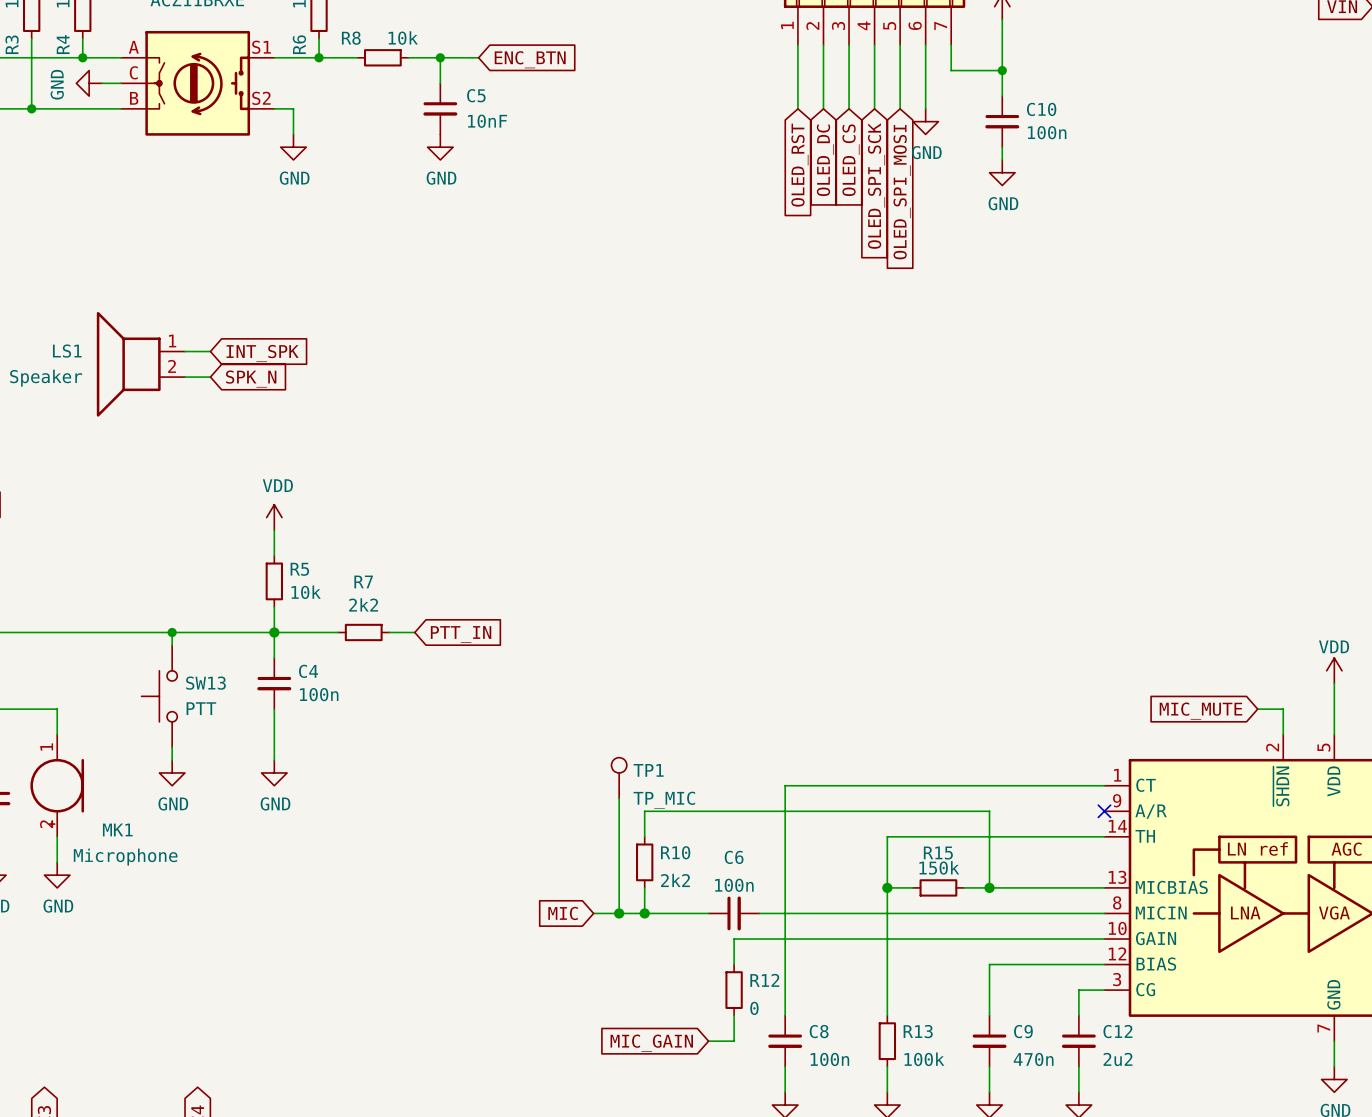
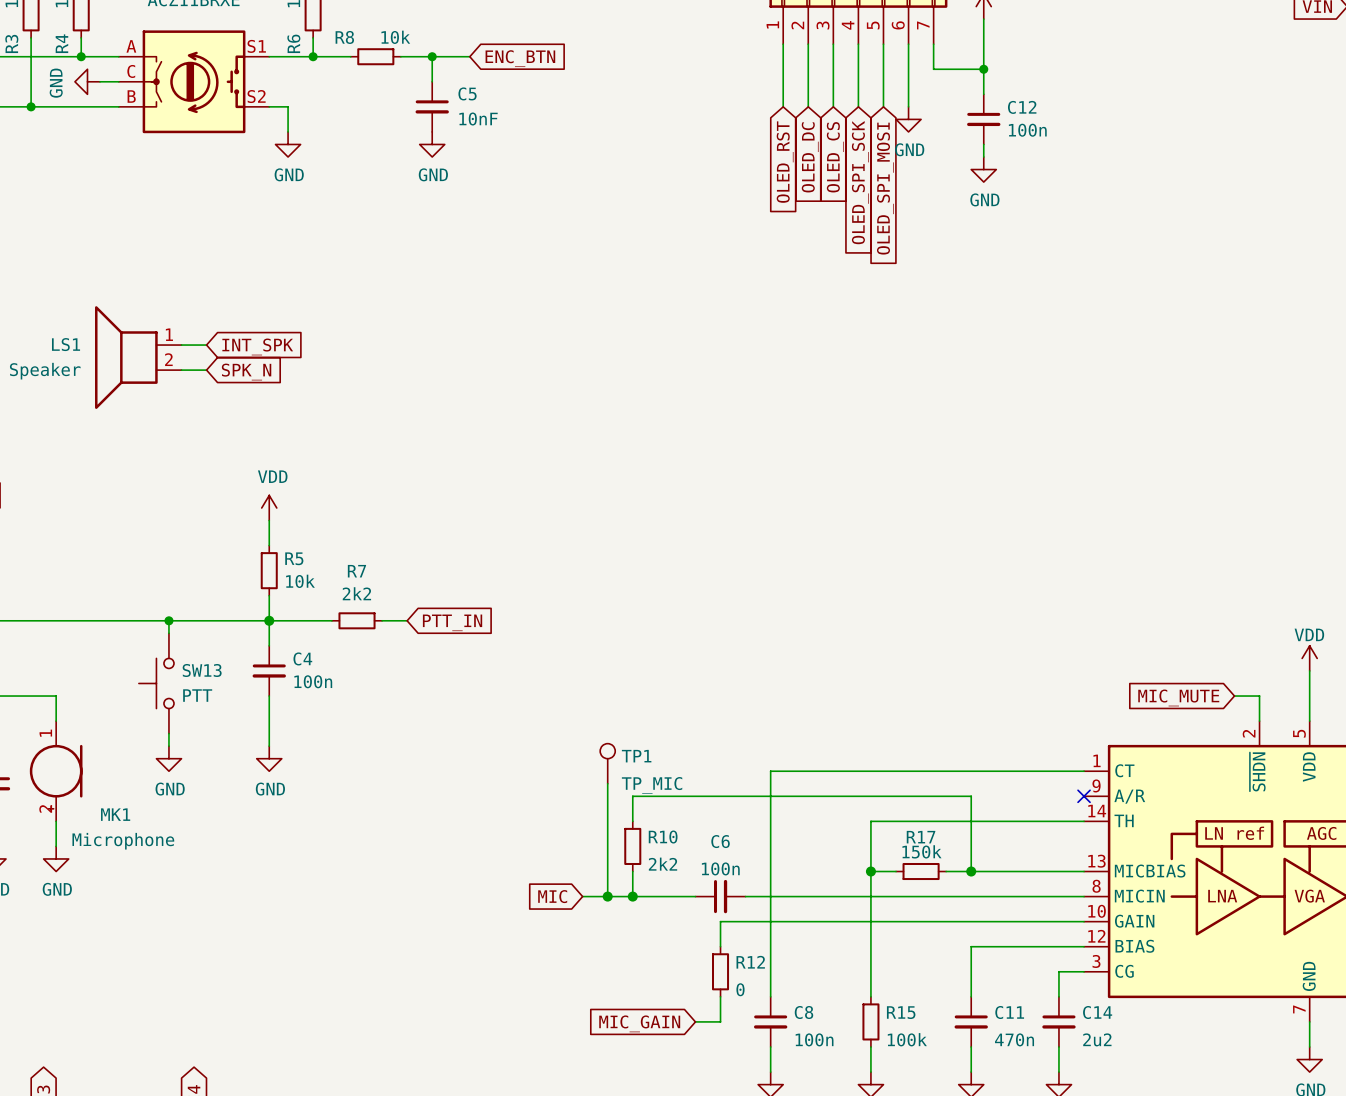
C10 name: C10 (1041, 109) -> C12 (1022, 107)
R15 name: R15 (938, 853) -> R17 (921, 837)
R13 name: R13 (918, 1031) -> R15 (901, 1012)
C9 name: C9 (1023, 1031) -> C11 (1009, 1012)
C12 name: C12 (1117, 1031) -> C14 (1097, 1012)

